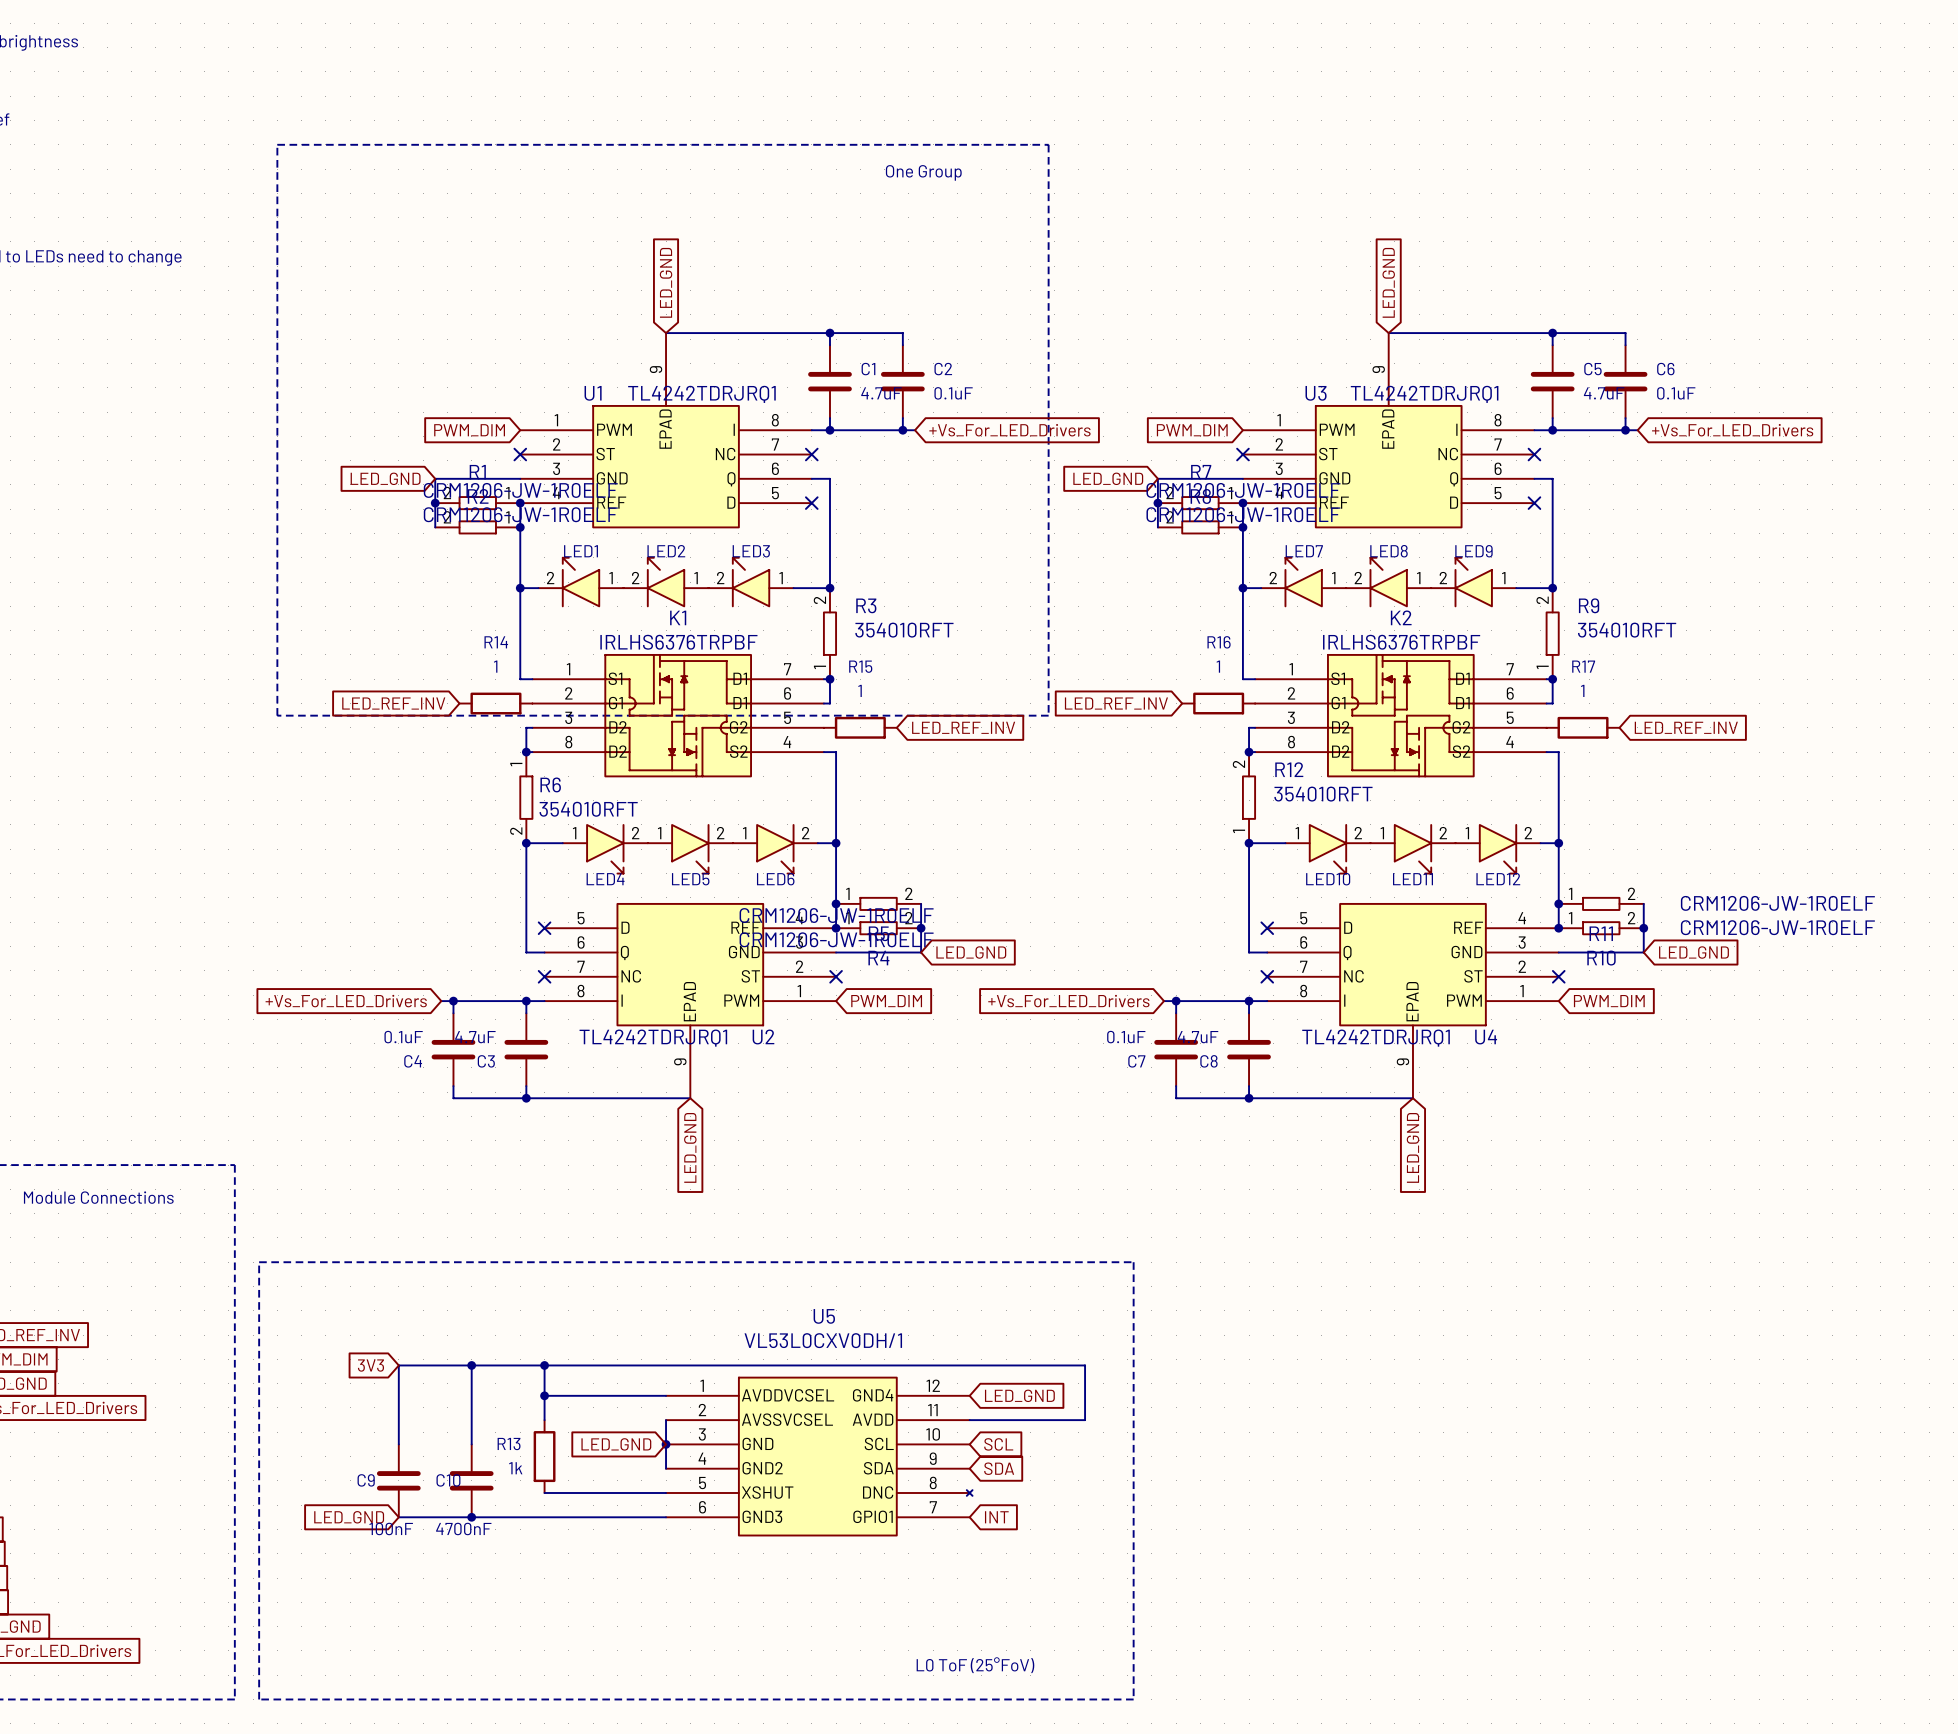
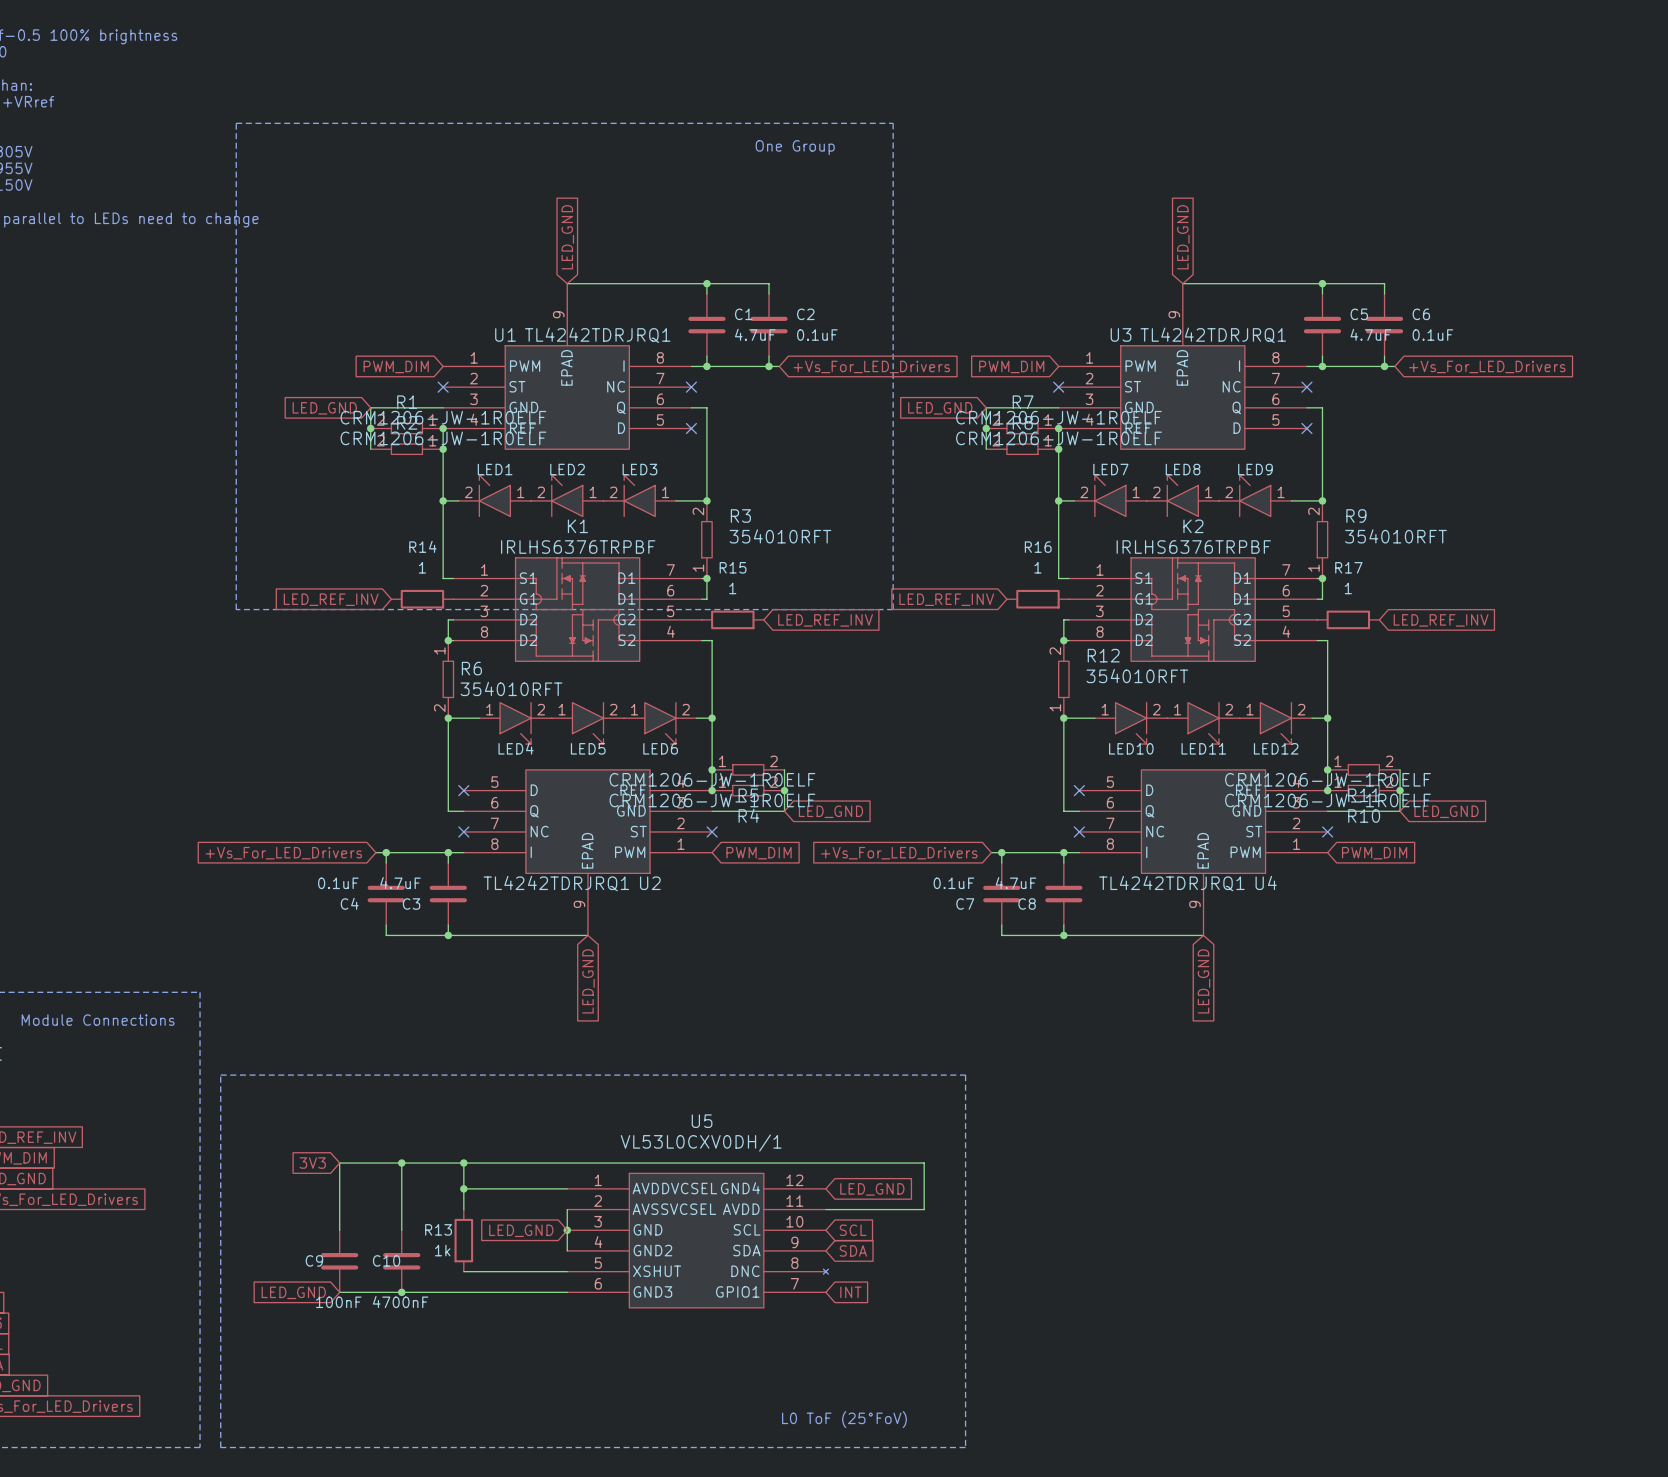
R11 value position: CRM1206-JW-1R0ELF (1777, 903) -> CRM1206-JW-1R0ELF (1327, 779)
R10 value position: CRM1206-JW-1R0ELF (1777, 927) -> CRM1206-JW-1R0ELF (1327, 800)

